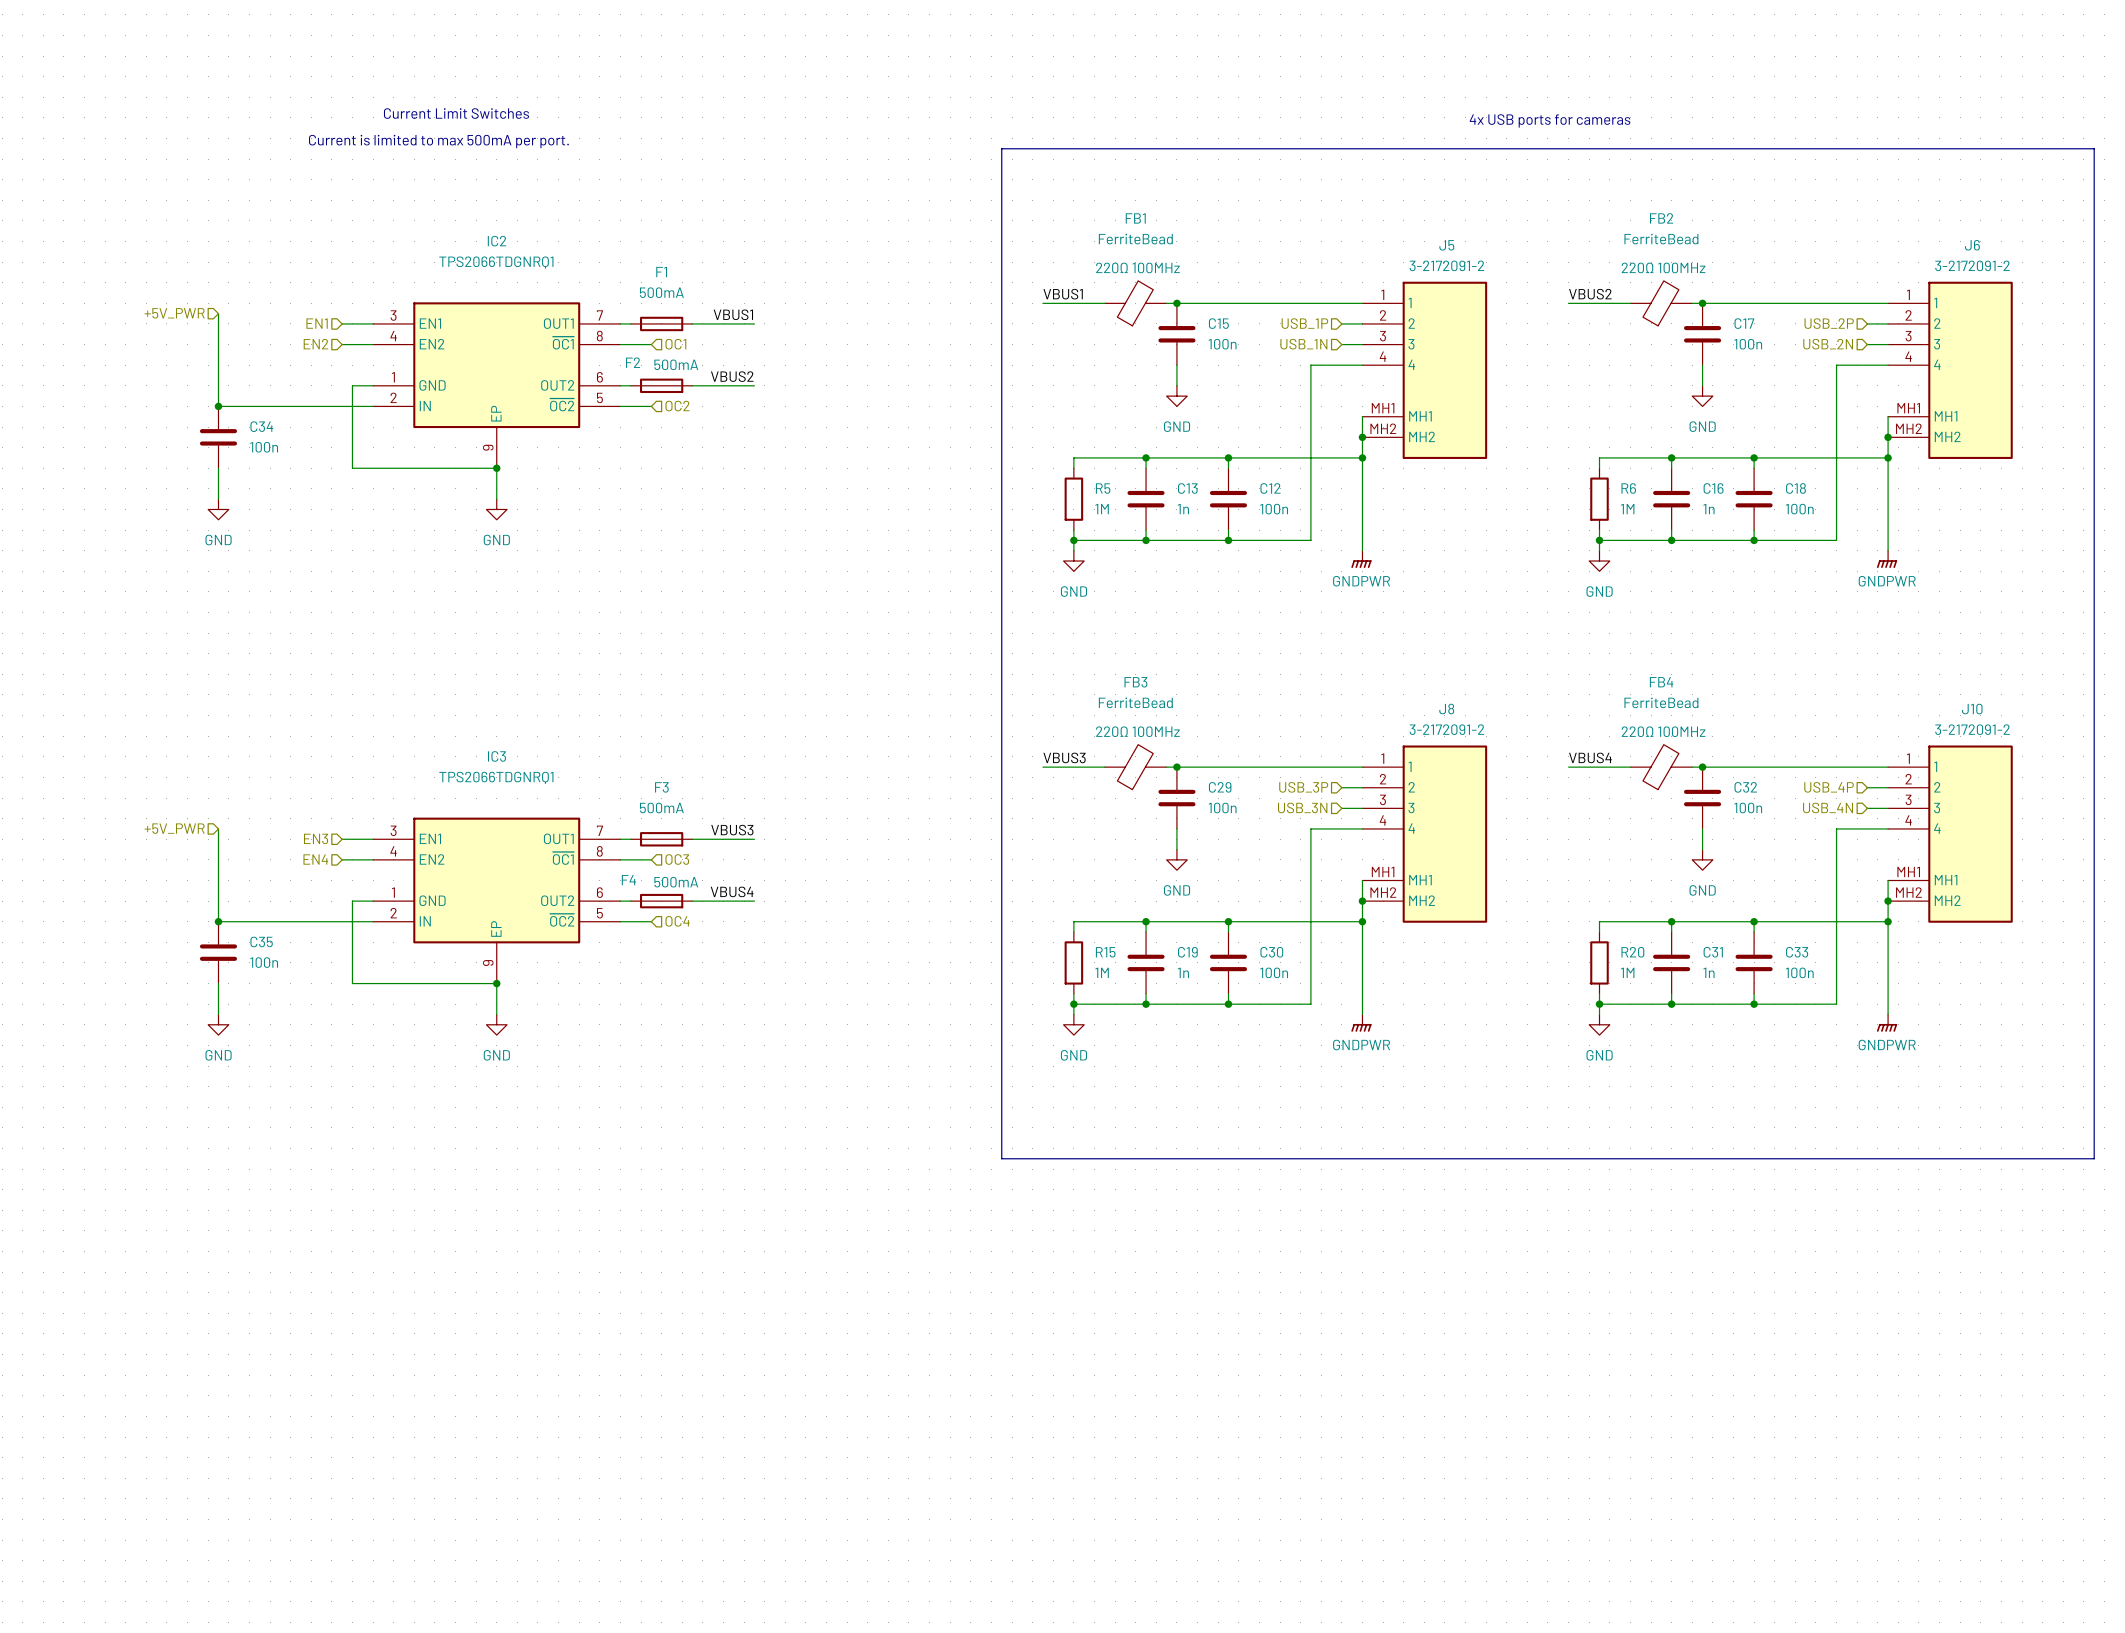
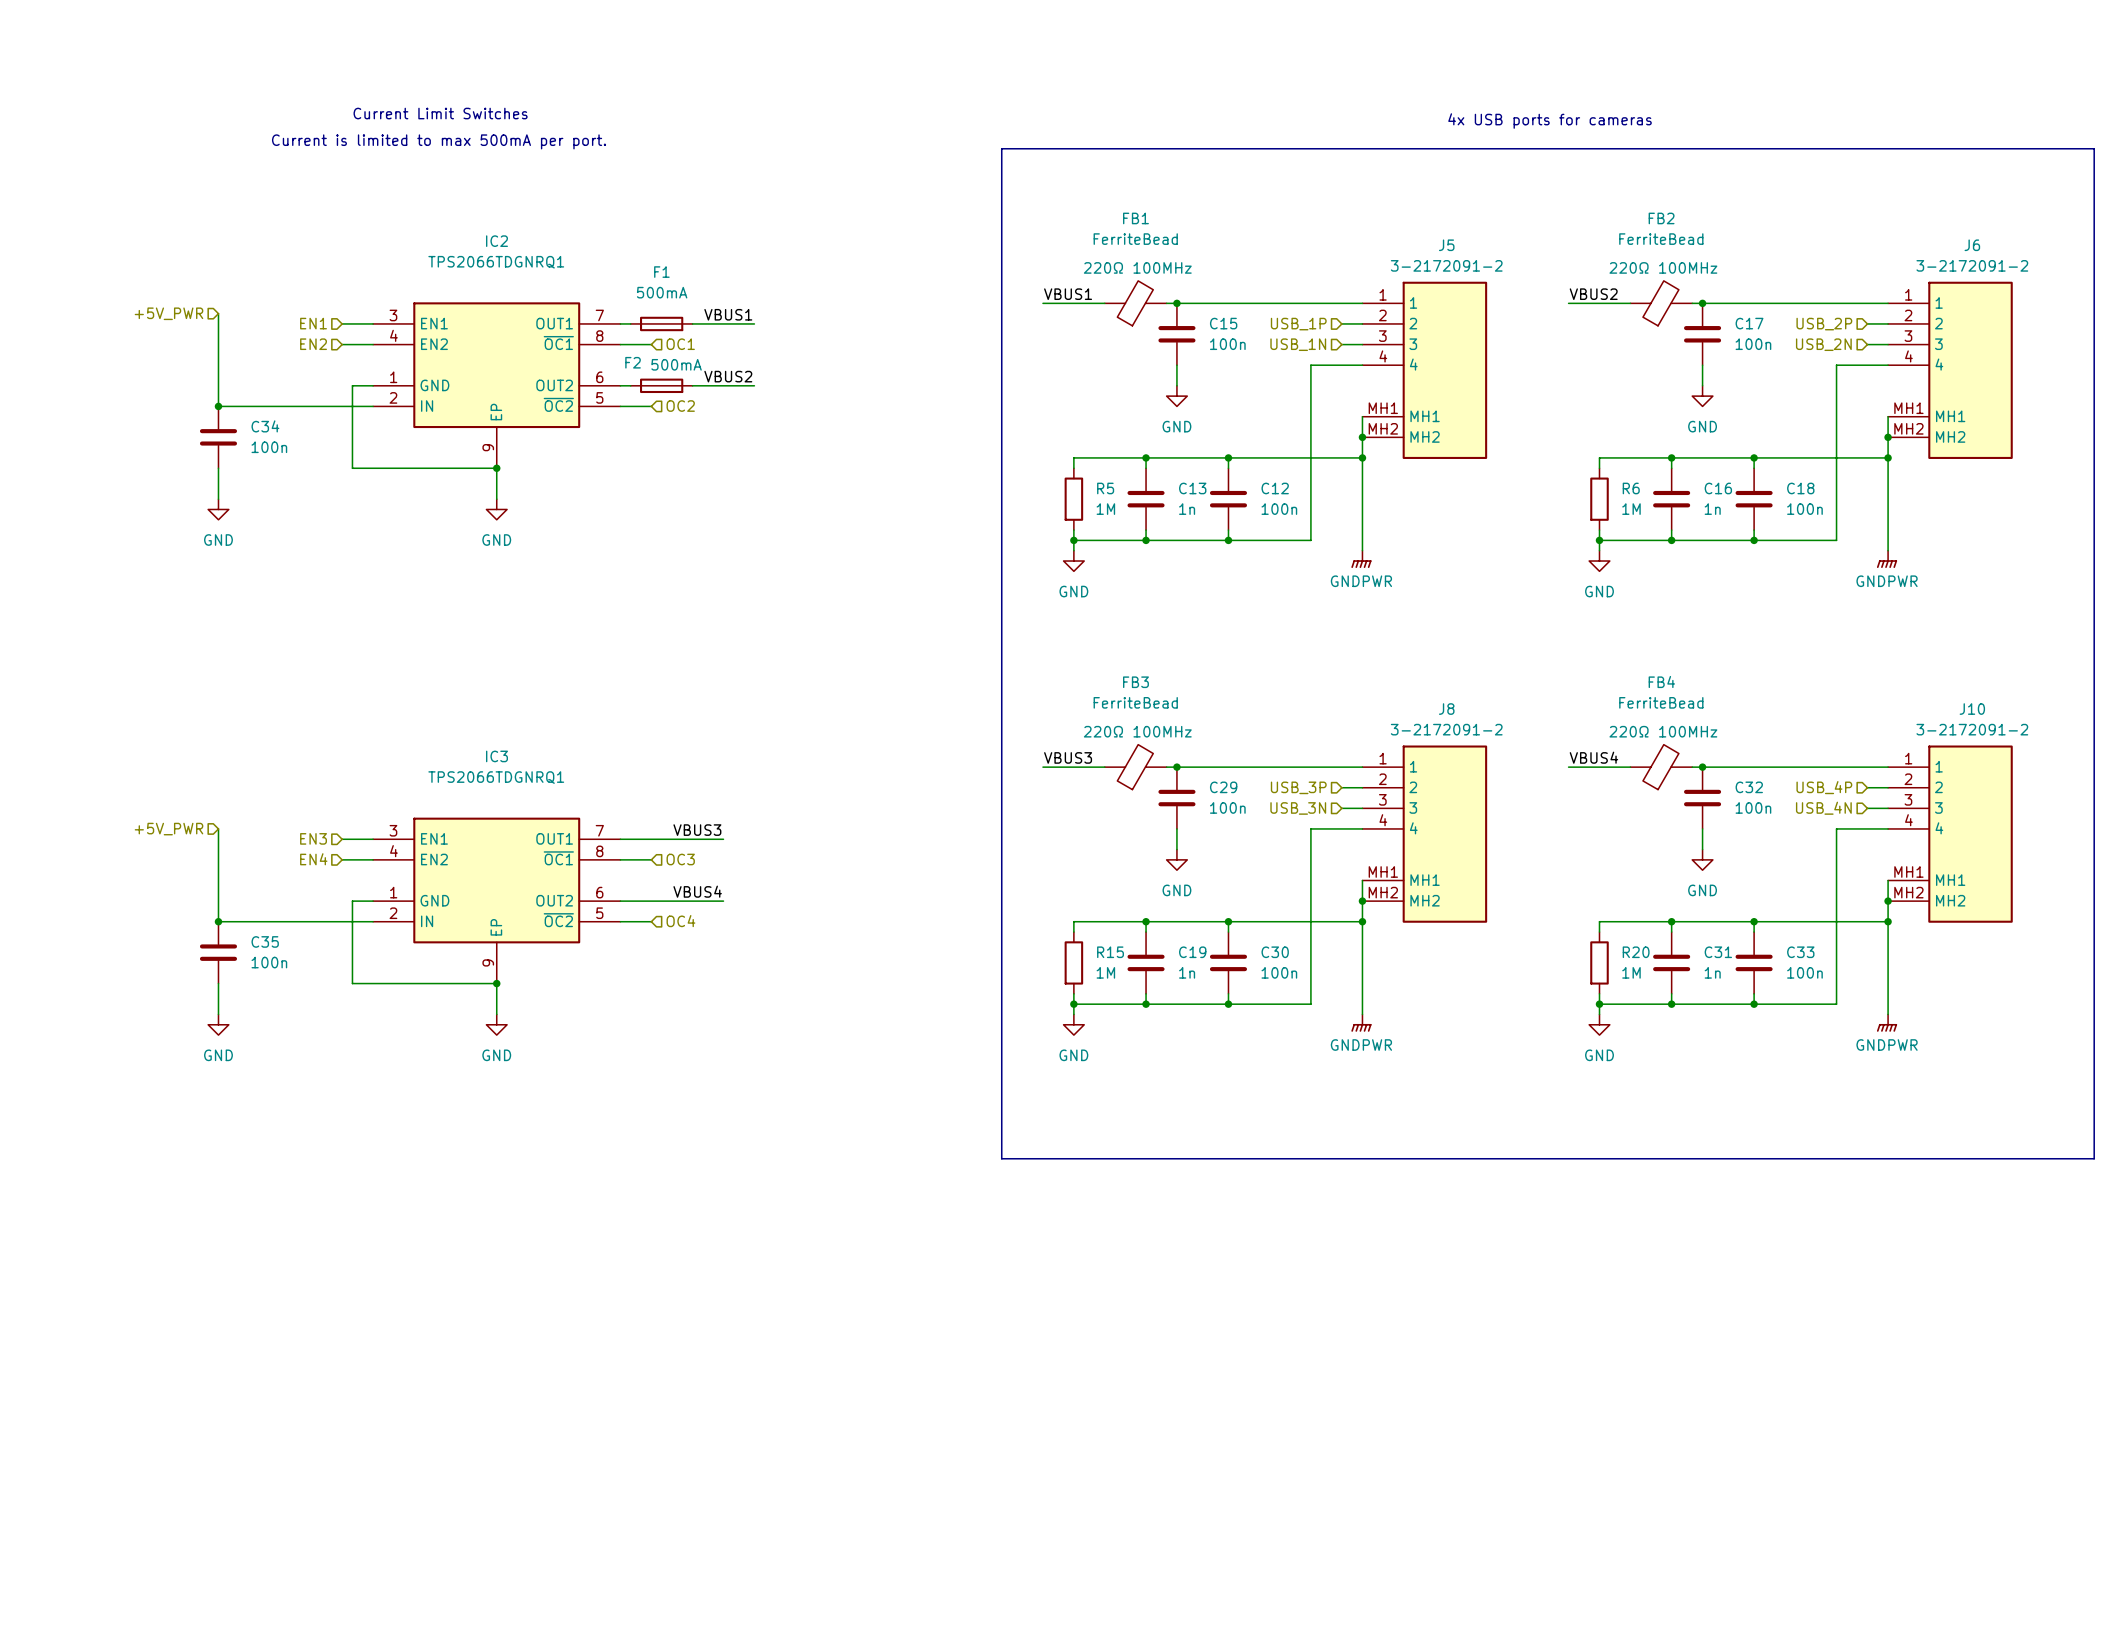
label position: VBUS3 (732, 830) -> VBUS3 (697, 830)
F3: 500mA (661, 839) -> none
wire: (723, 839) (754, 839) -> none
label position: VBUS4 (732, 891) -> VBUS4 (697, 891)
F4: 500mA (661, 901) -> none
wire: (723, 901) (754, 901) -> none

